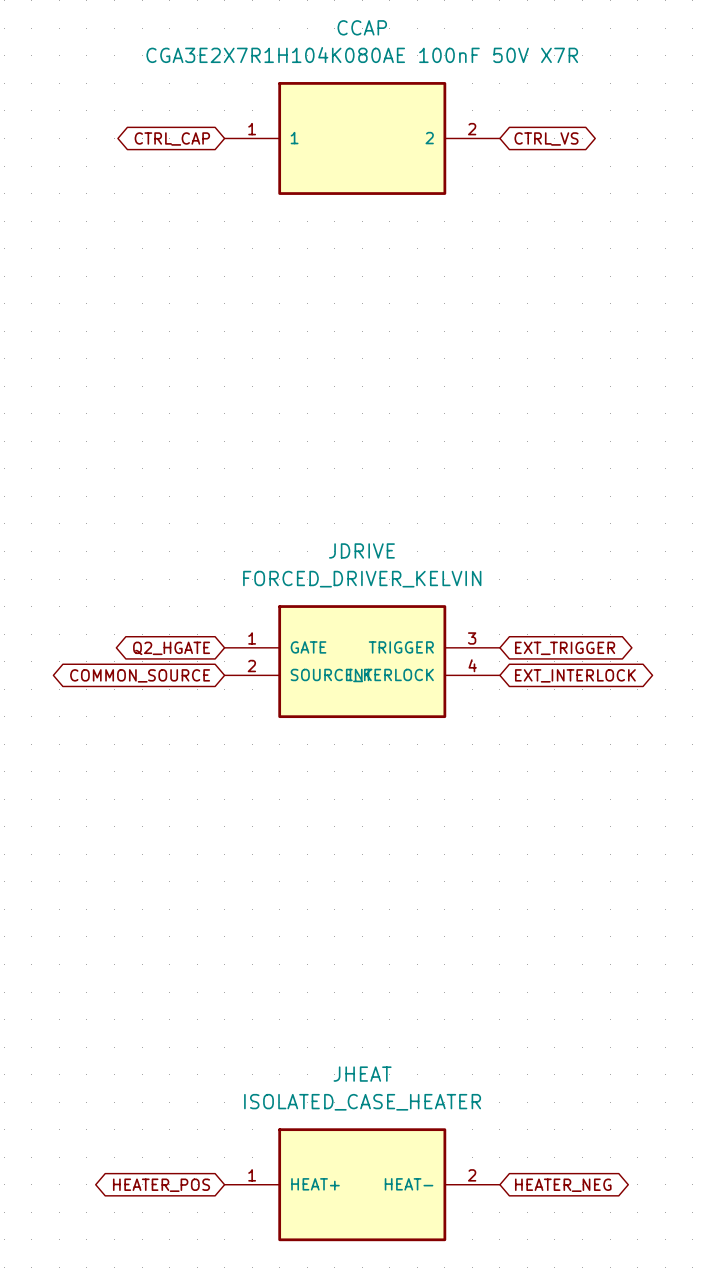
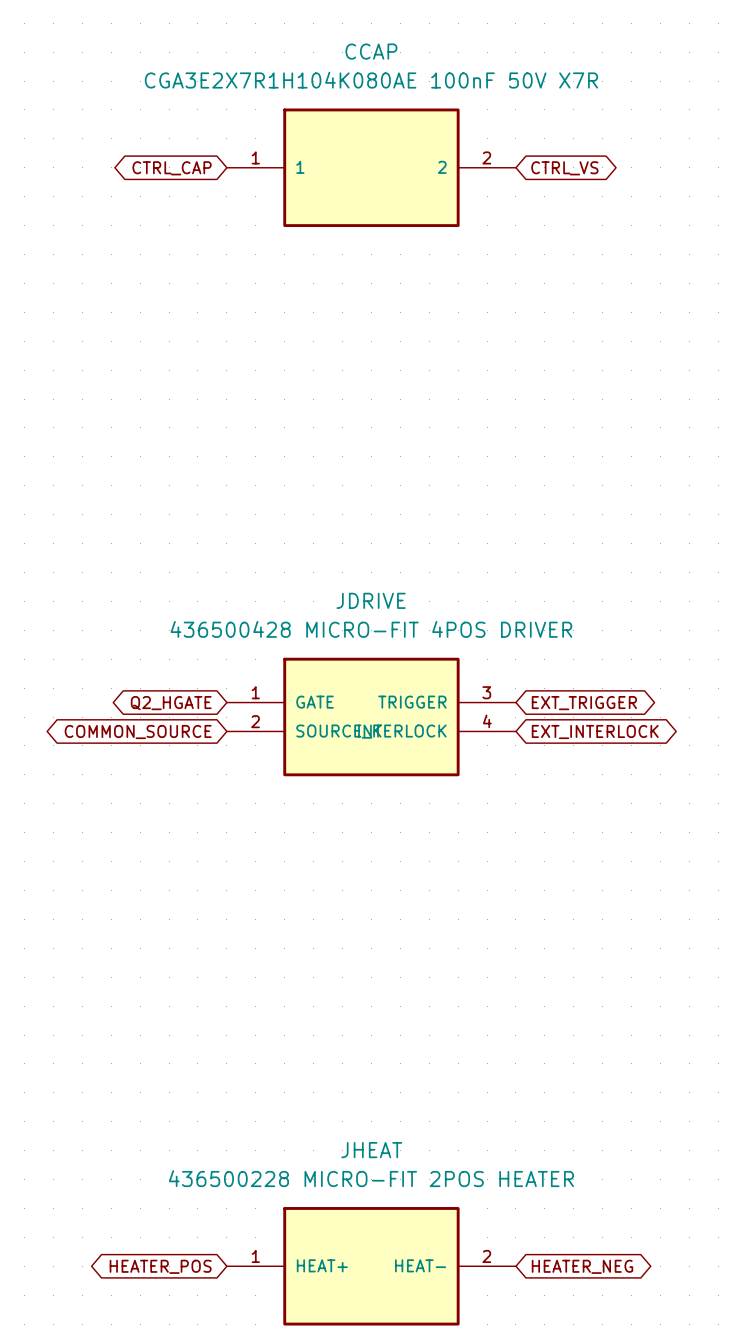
JDRIVE value: FORCED_DRIVER_KELVIN (362, 579) -> 436500428 MICRO-FIT 4POS DRIVER (371, 629)
JHEAT value: ISOLATED_CASE_HEATER (362, 1102) -> 436500228 MICRO-FIT 2POS HEATER (371, 1178)

